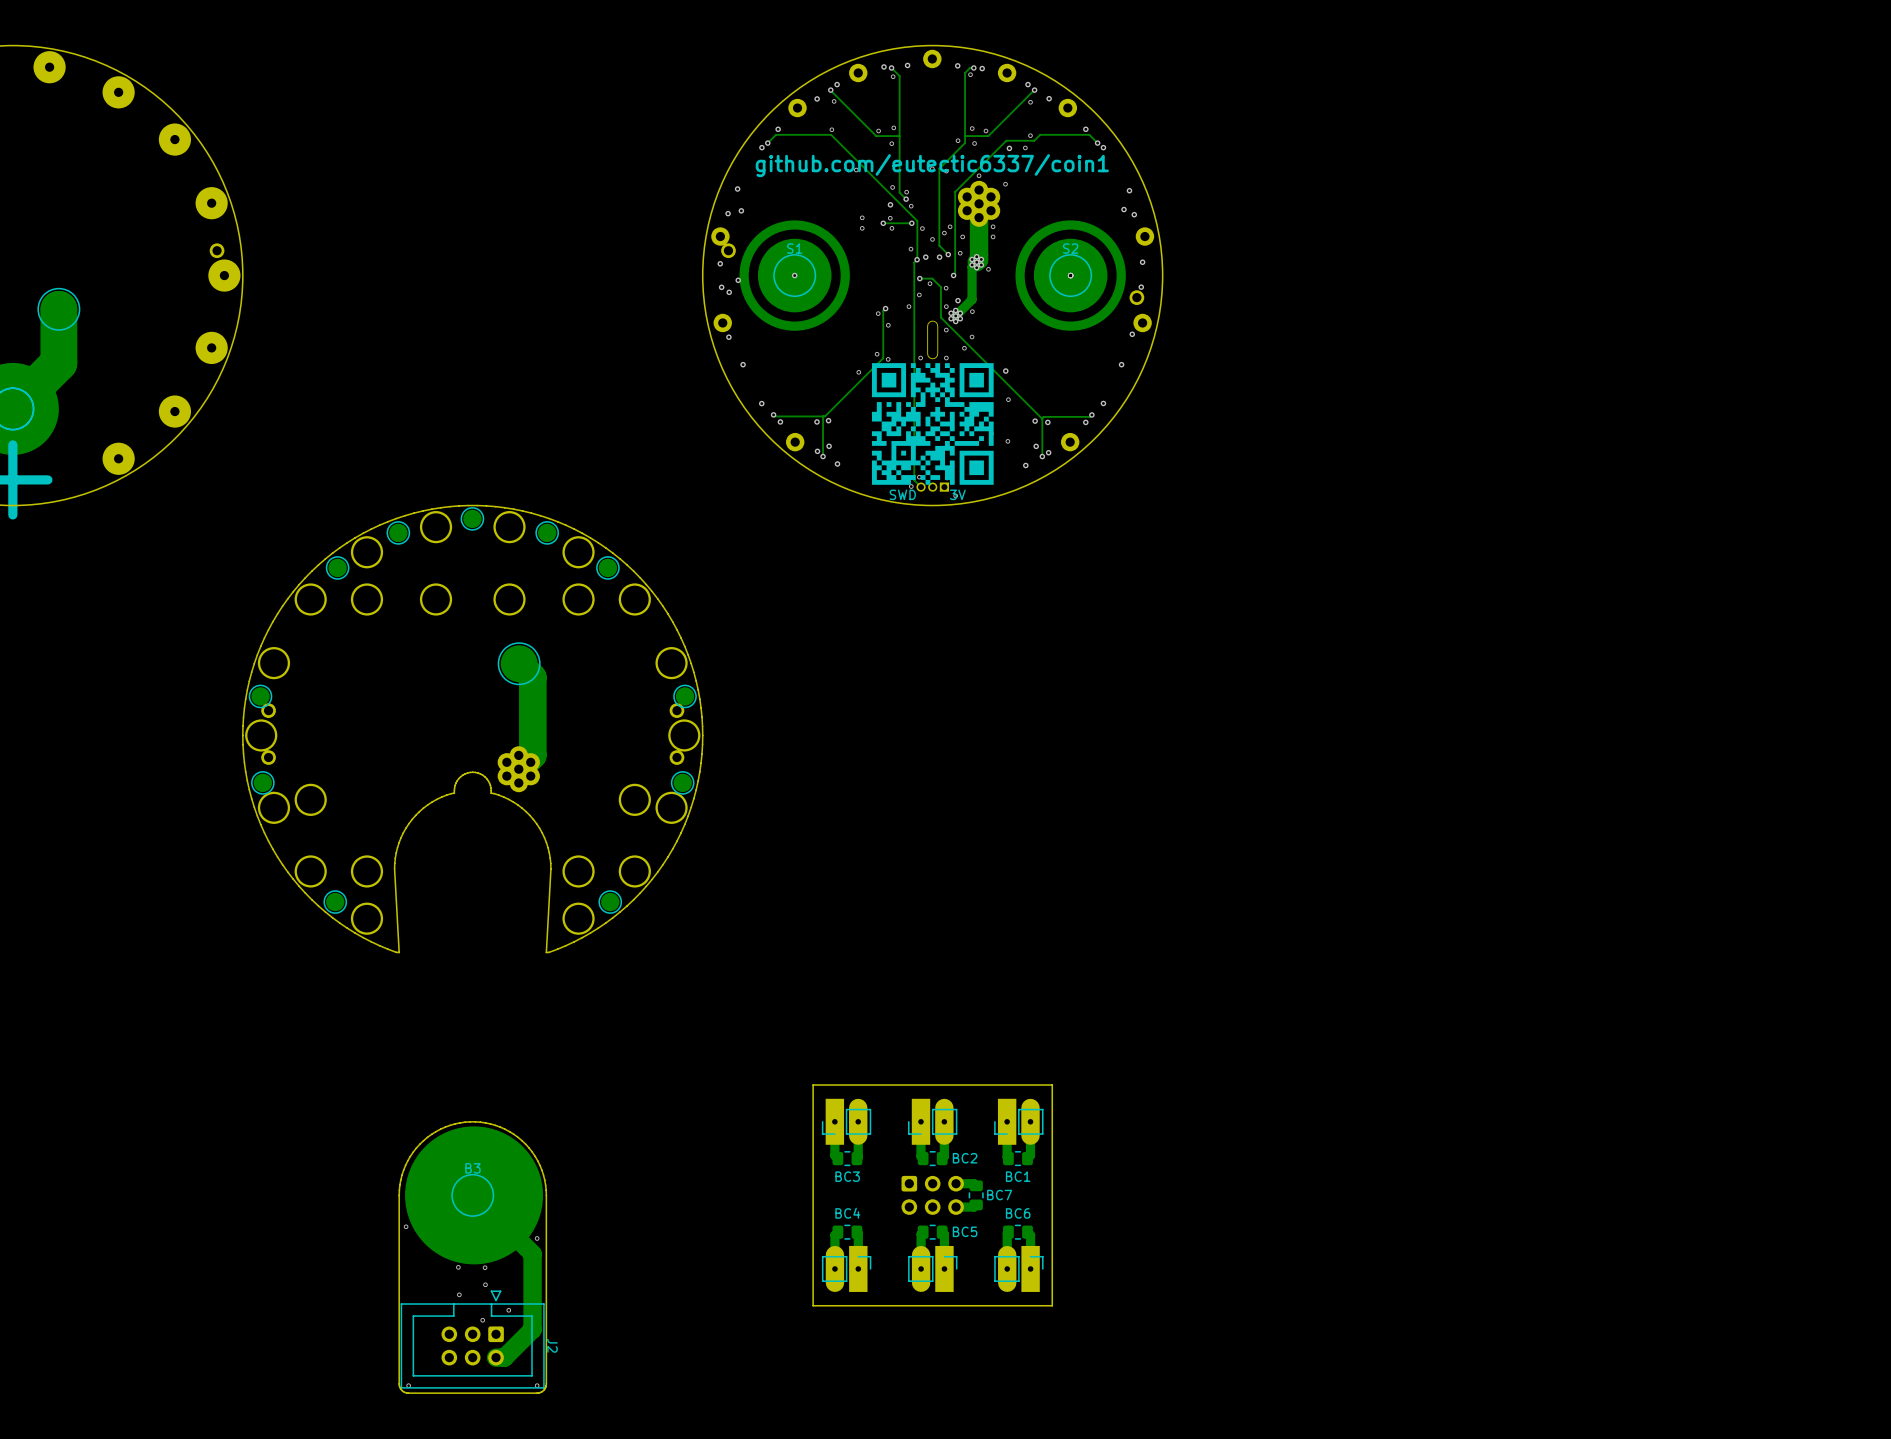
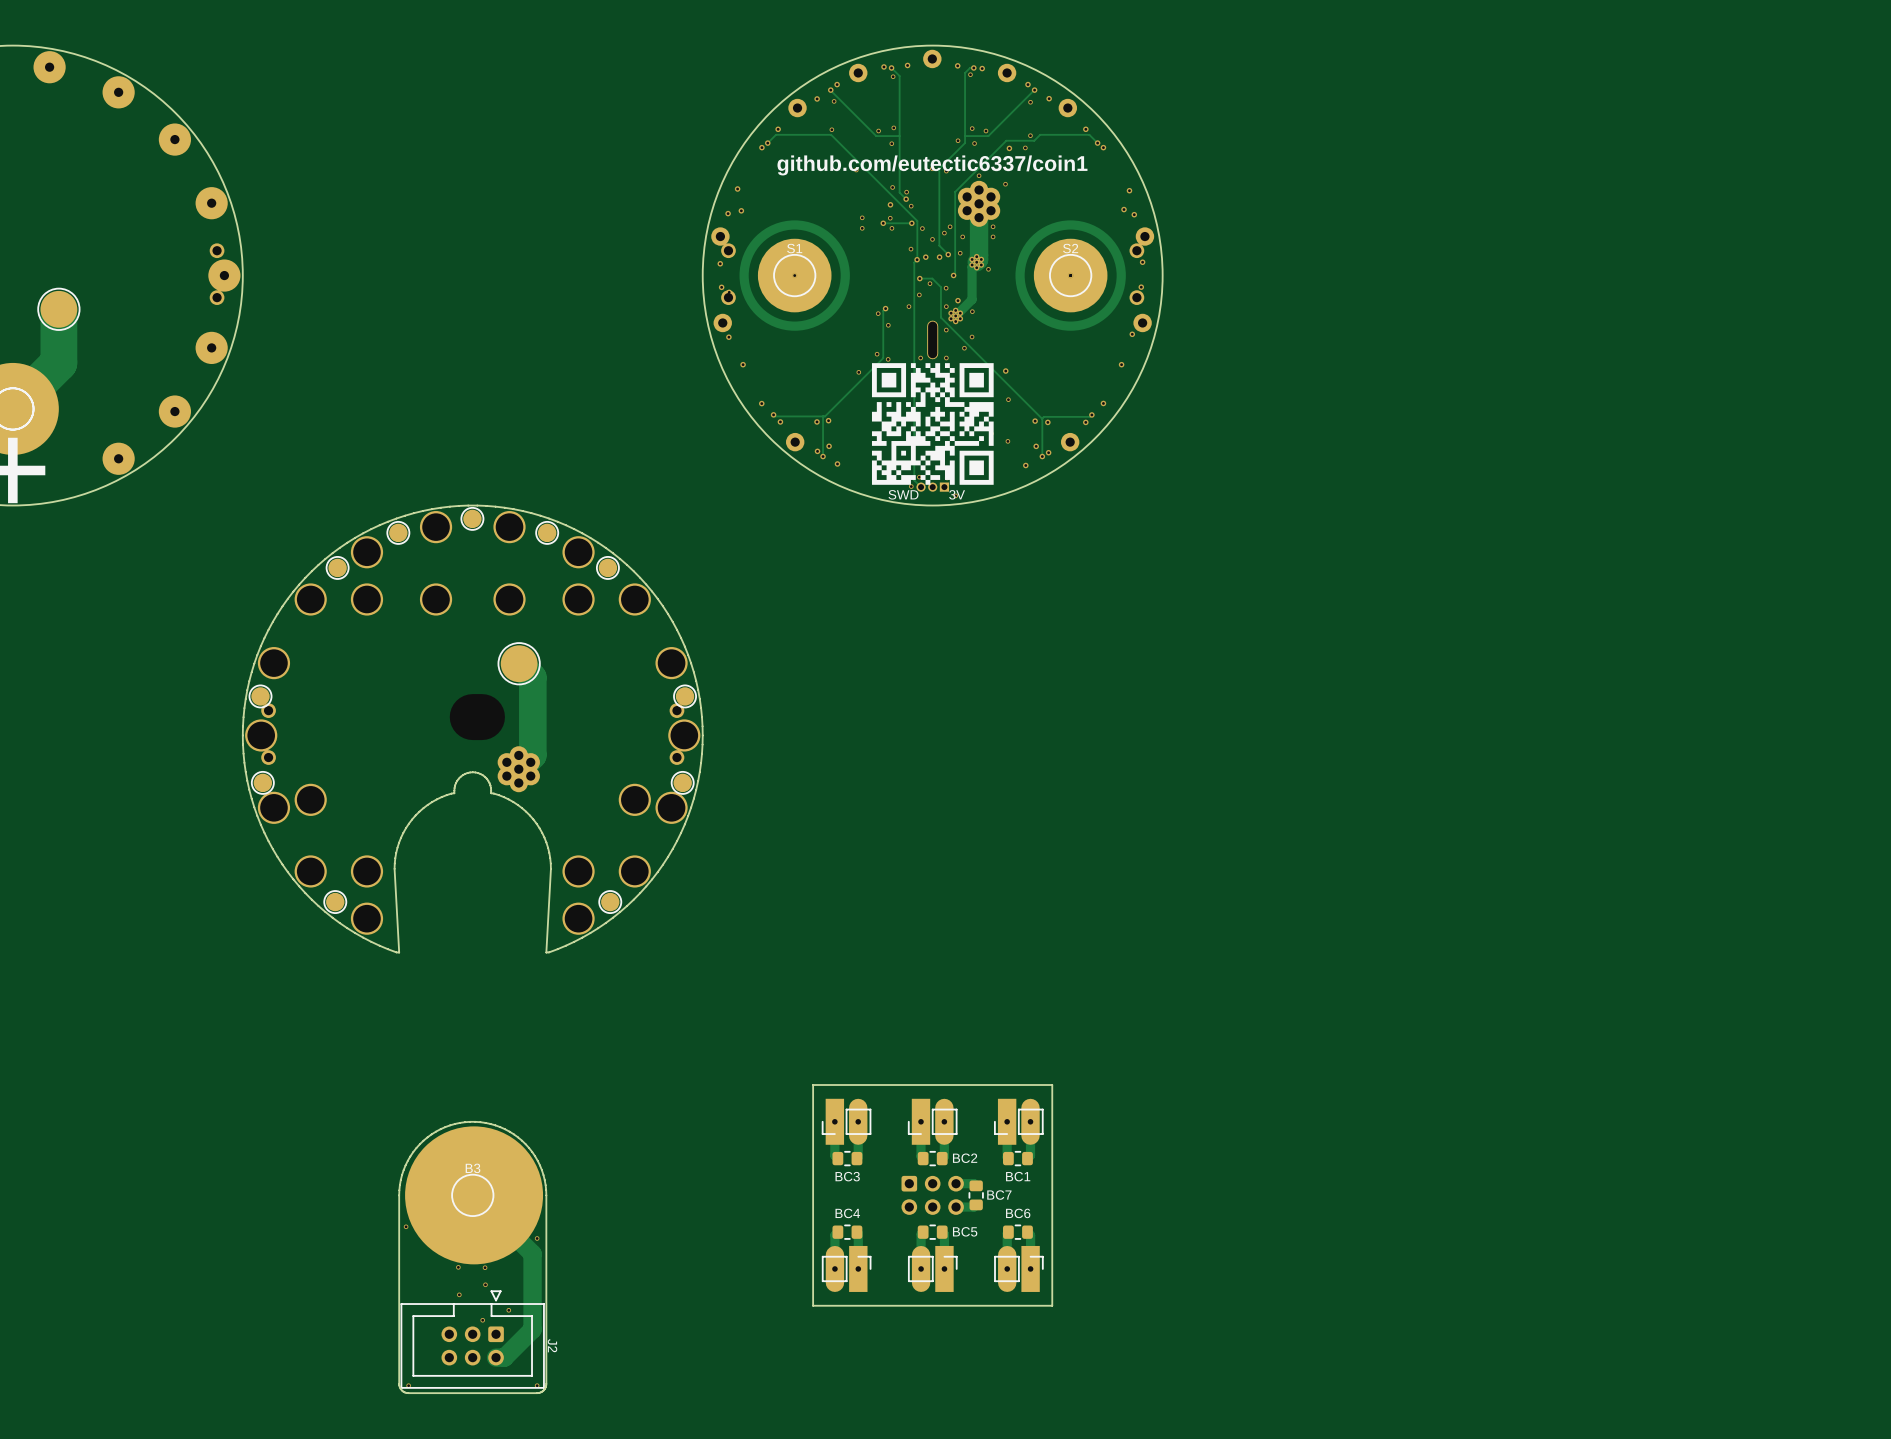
part: none -> (1136, 250)
via: (738, 280) -> none
part: none -> (217, 297)
part: none -> (728, 297)

